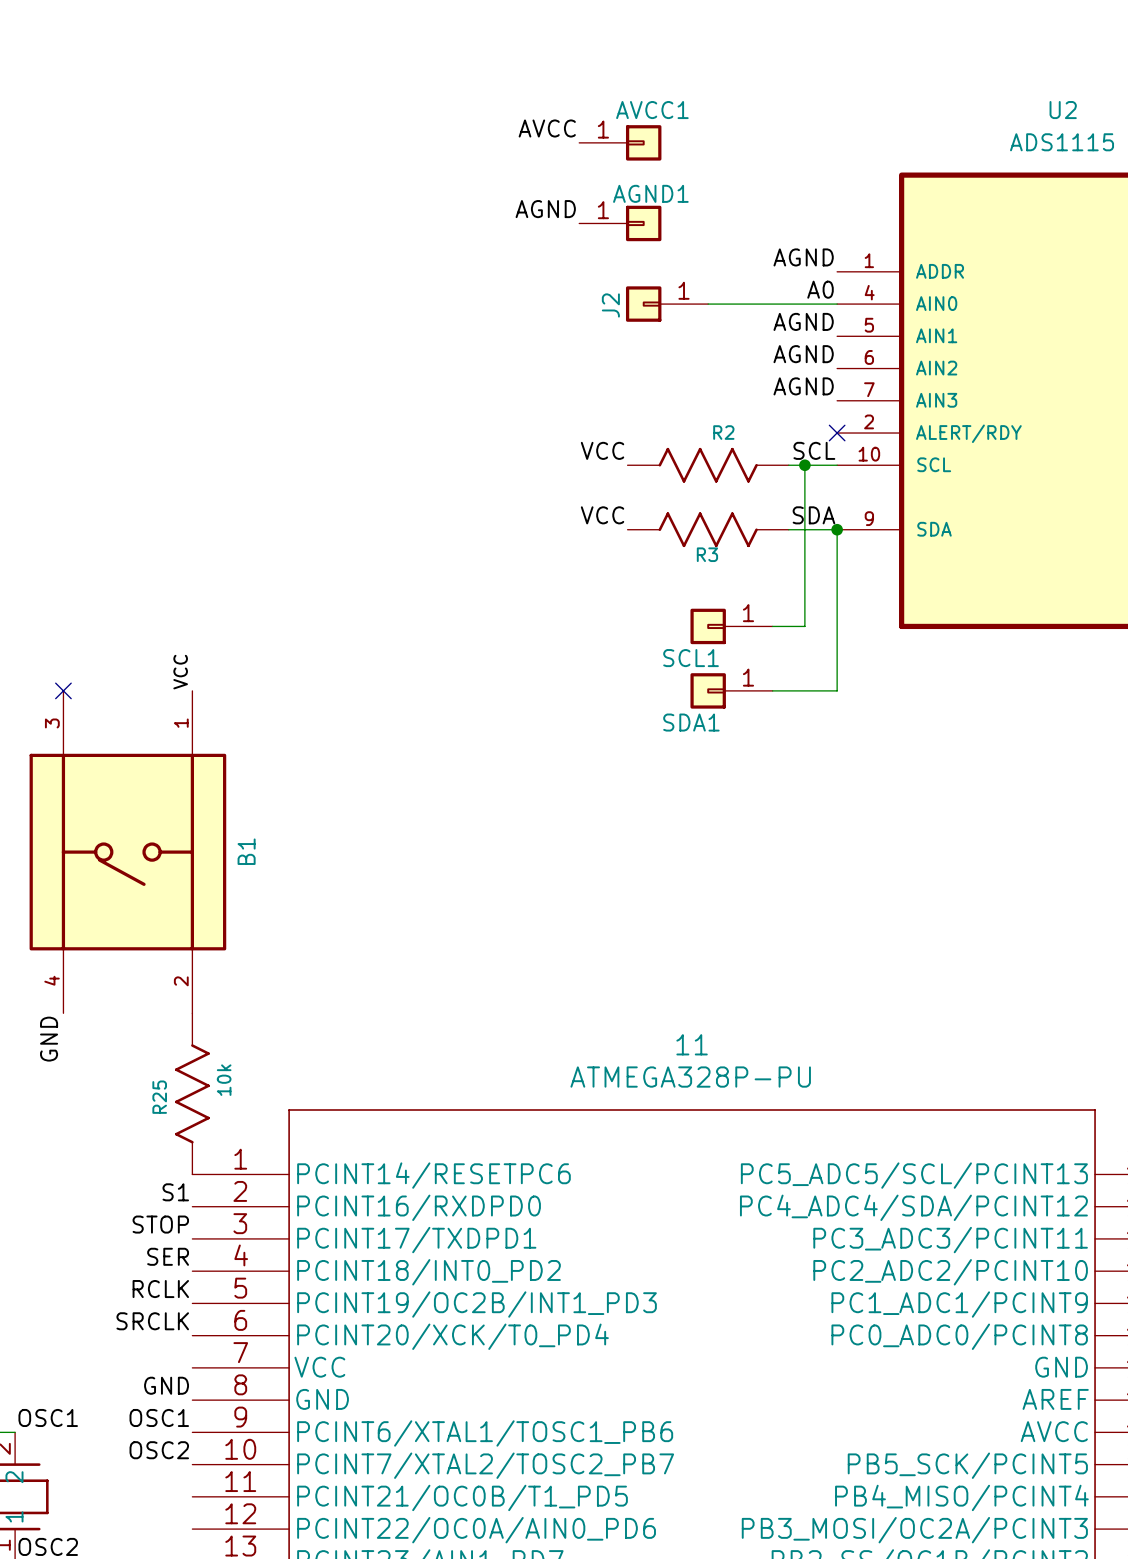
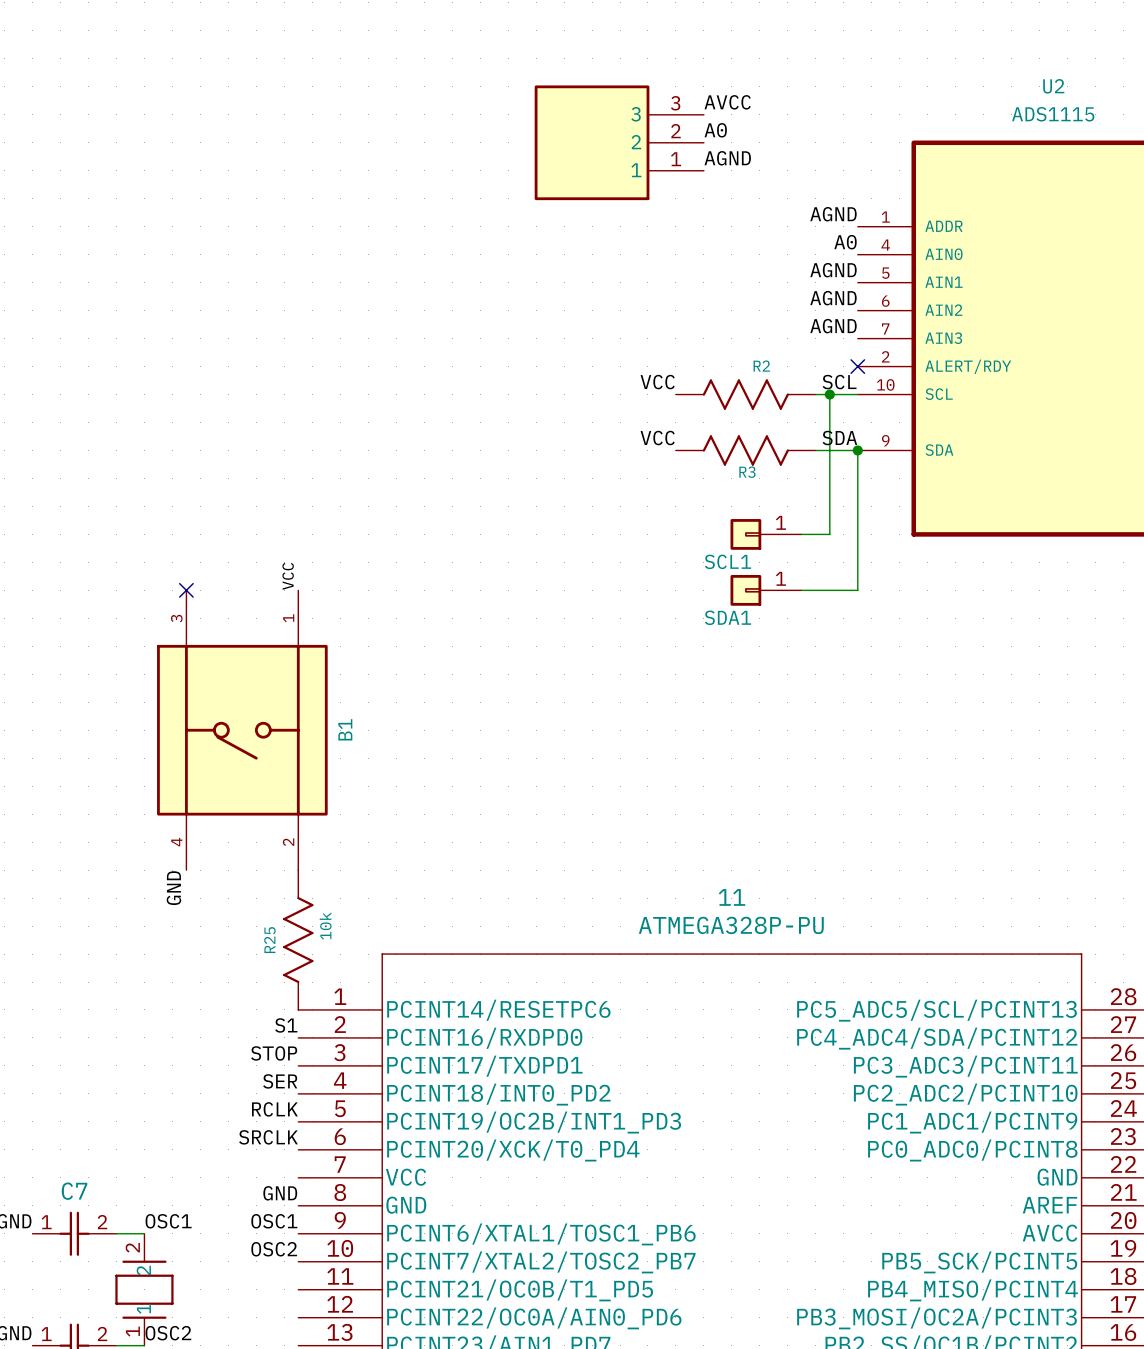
label position: AVCC (547, 128) -> AVCC (727, 102)
AVCC1: (620, 142) -> none
label: none -> A0 (715, 130)
part: none -> (619, 142)
label position: AGND (545, 209) -> AGND (727, 158)
AGND1: (620, 223) -> none
J2: (667, 304) -> none
wire: (708, 304) (837, 304) -> none

